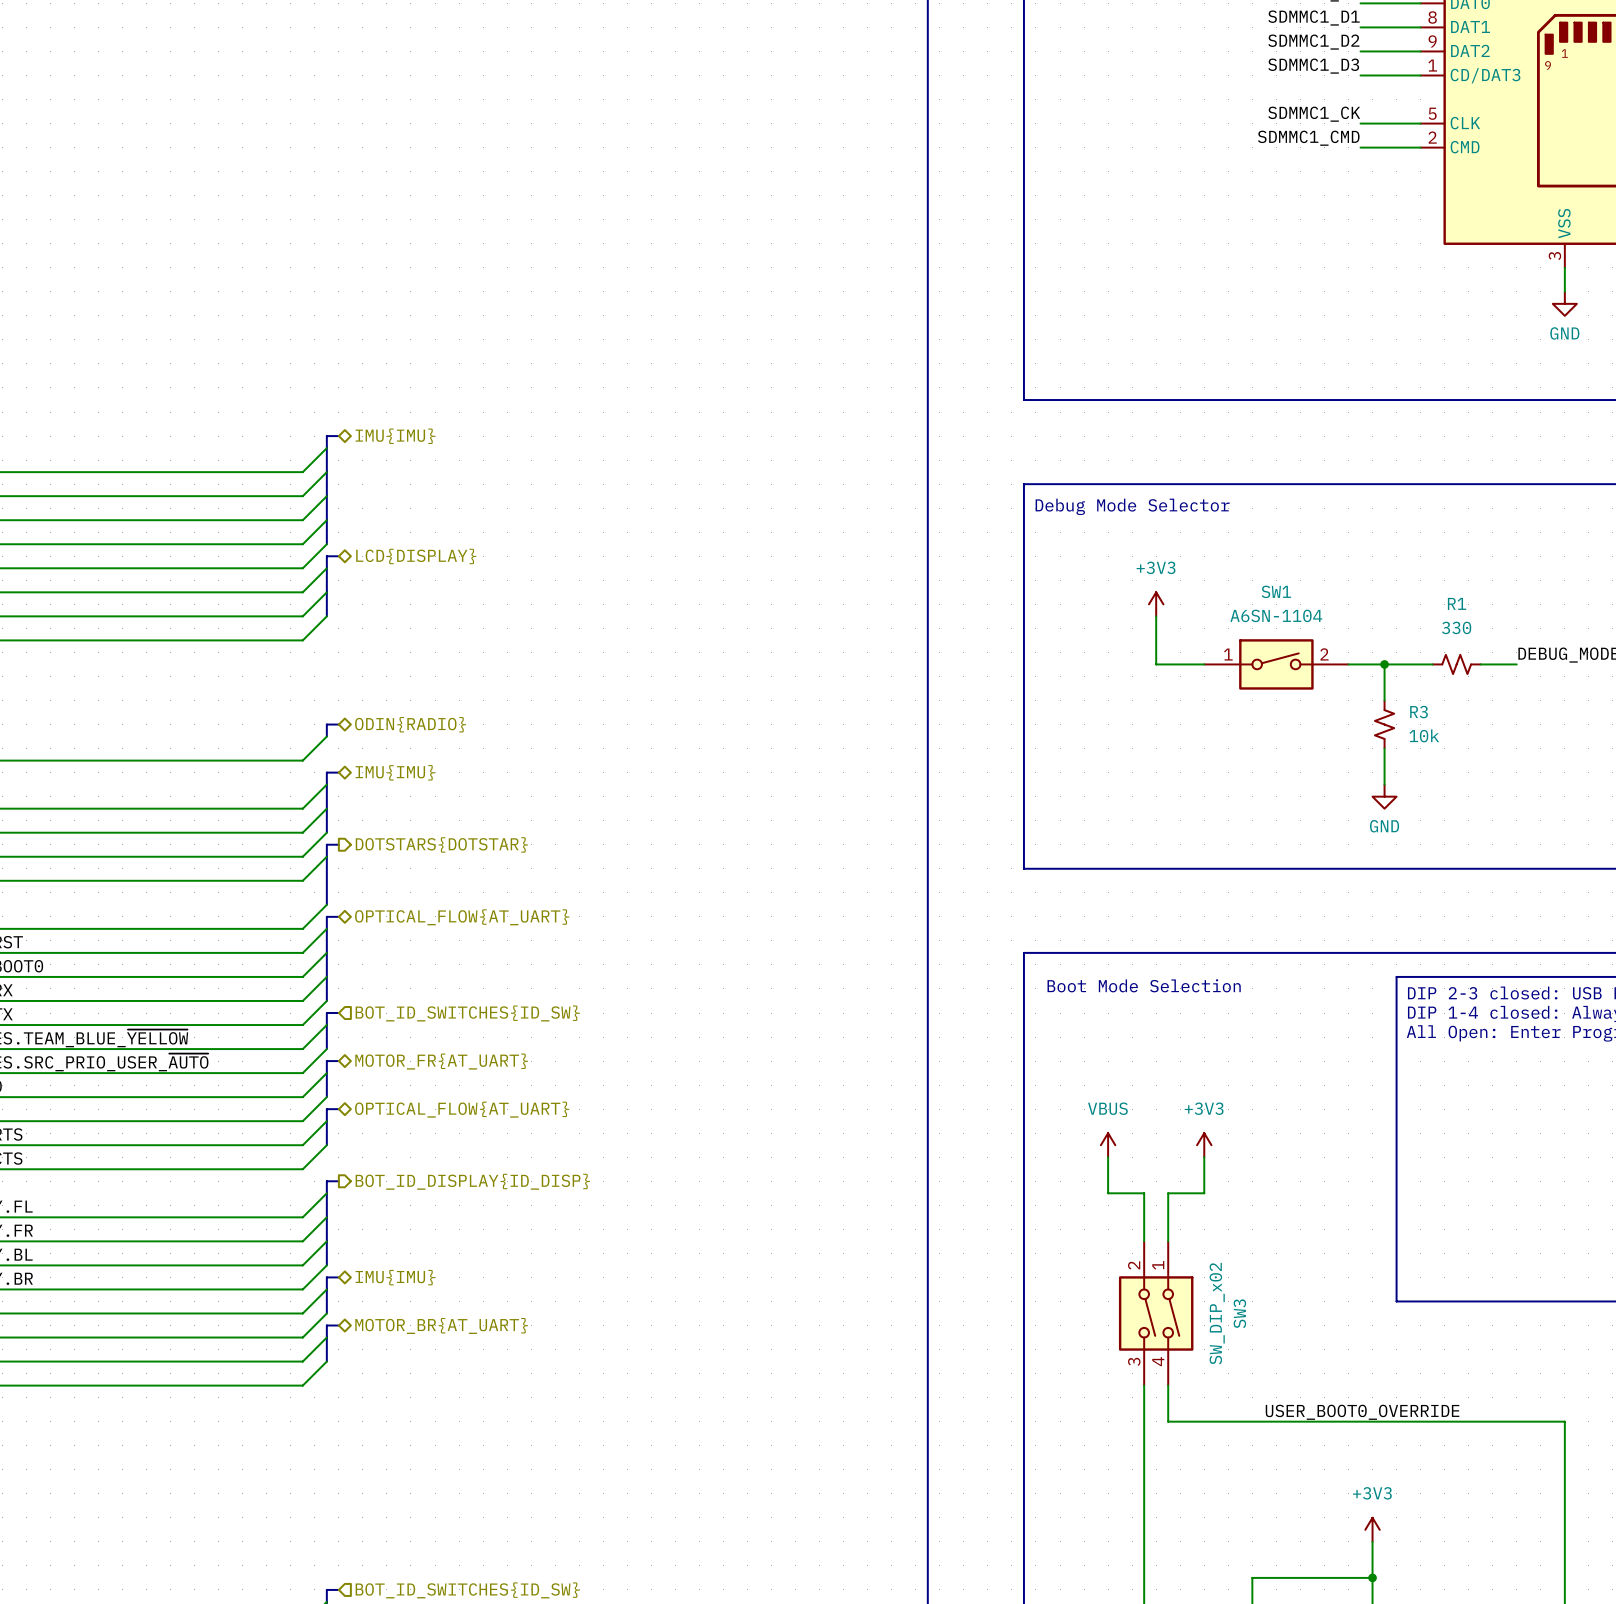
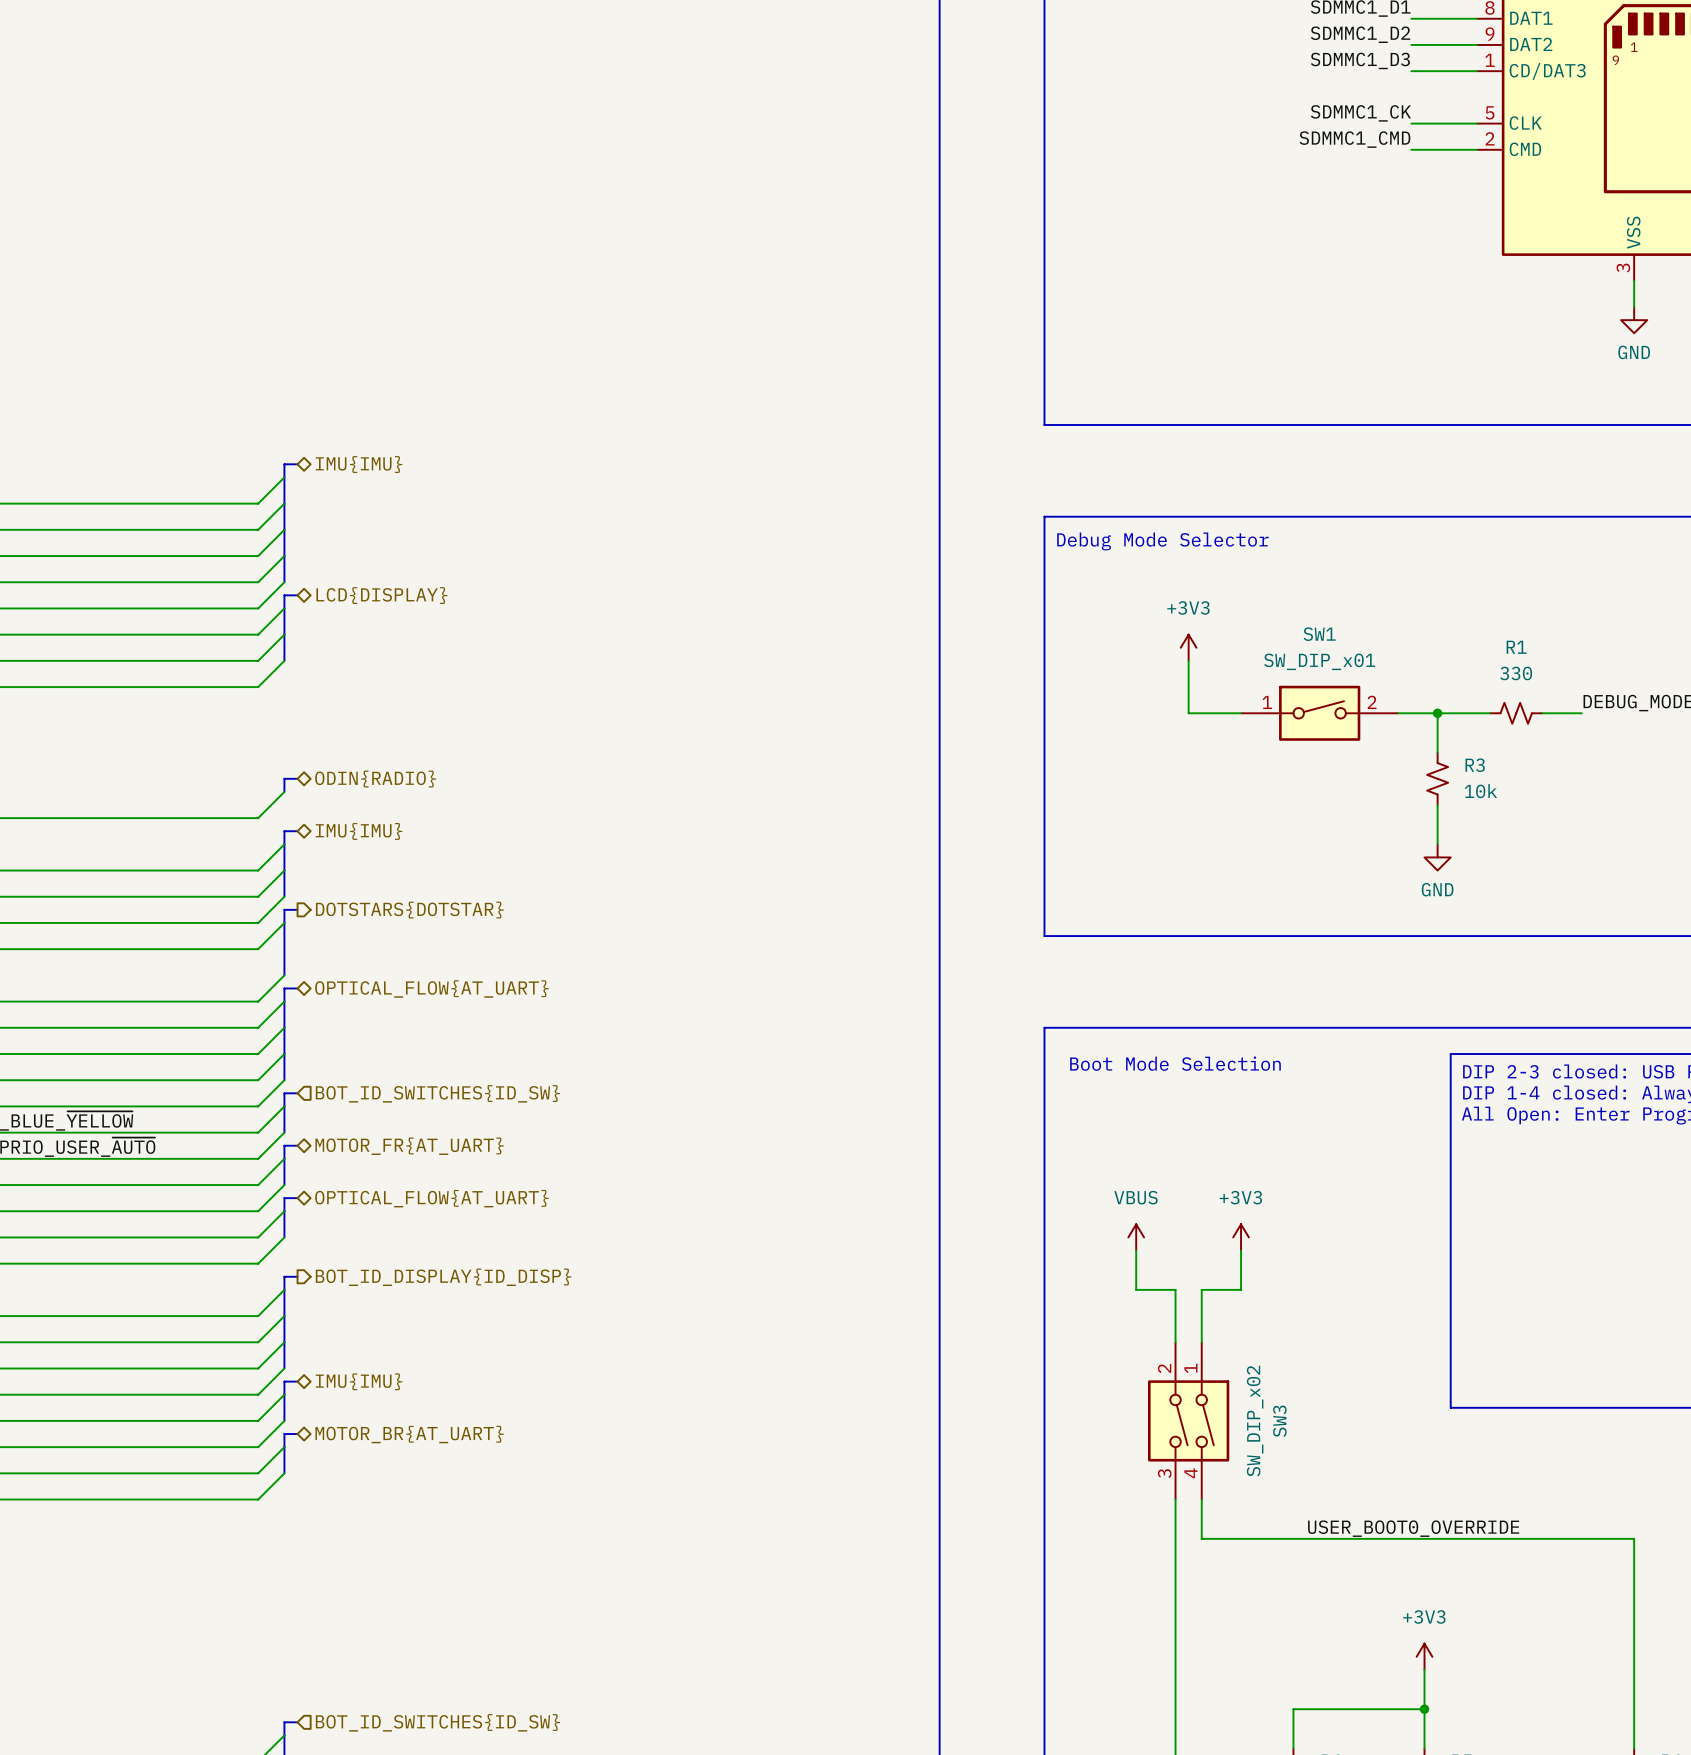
SW1 value: A6SN-1104 (1276, 615) -> SW_DIP_x01 (1319, 661)

